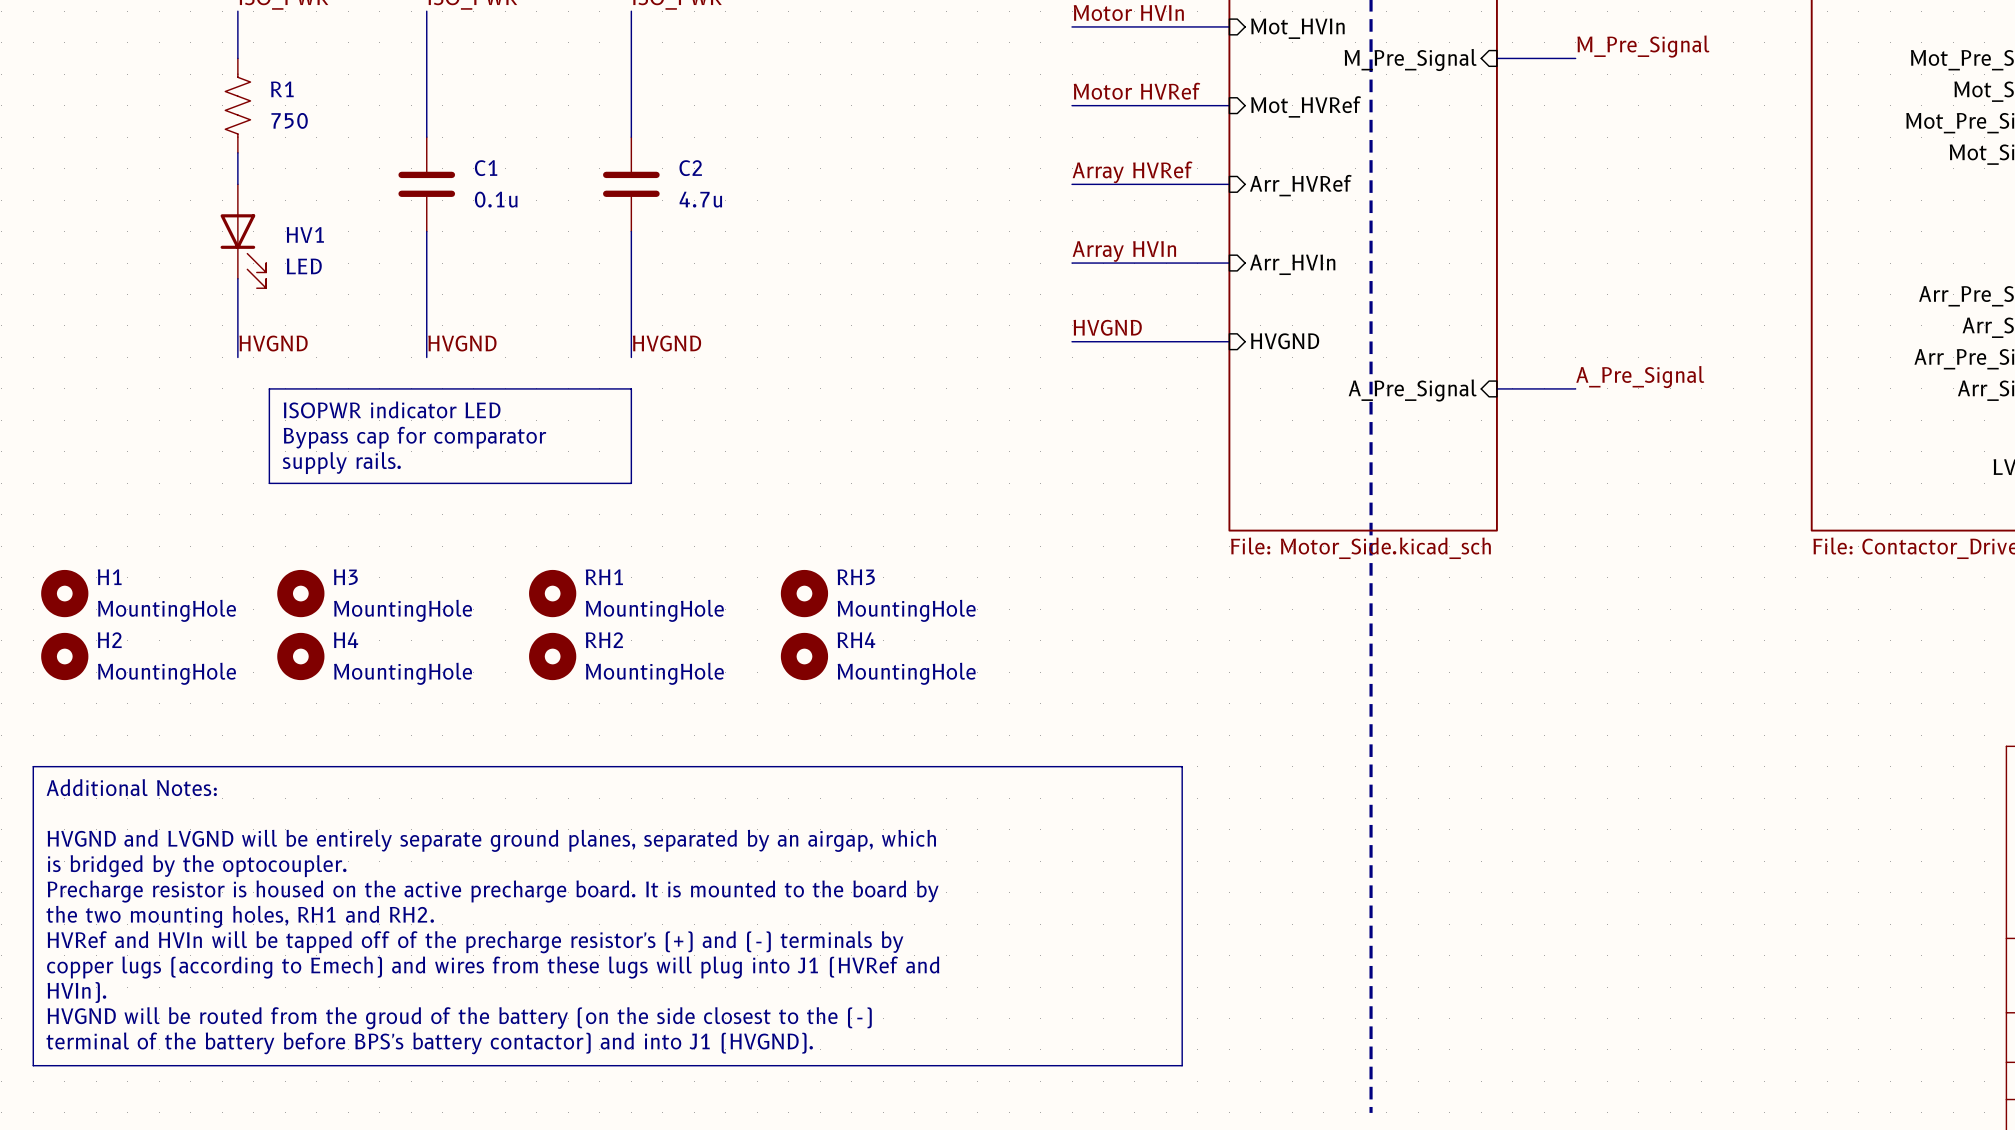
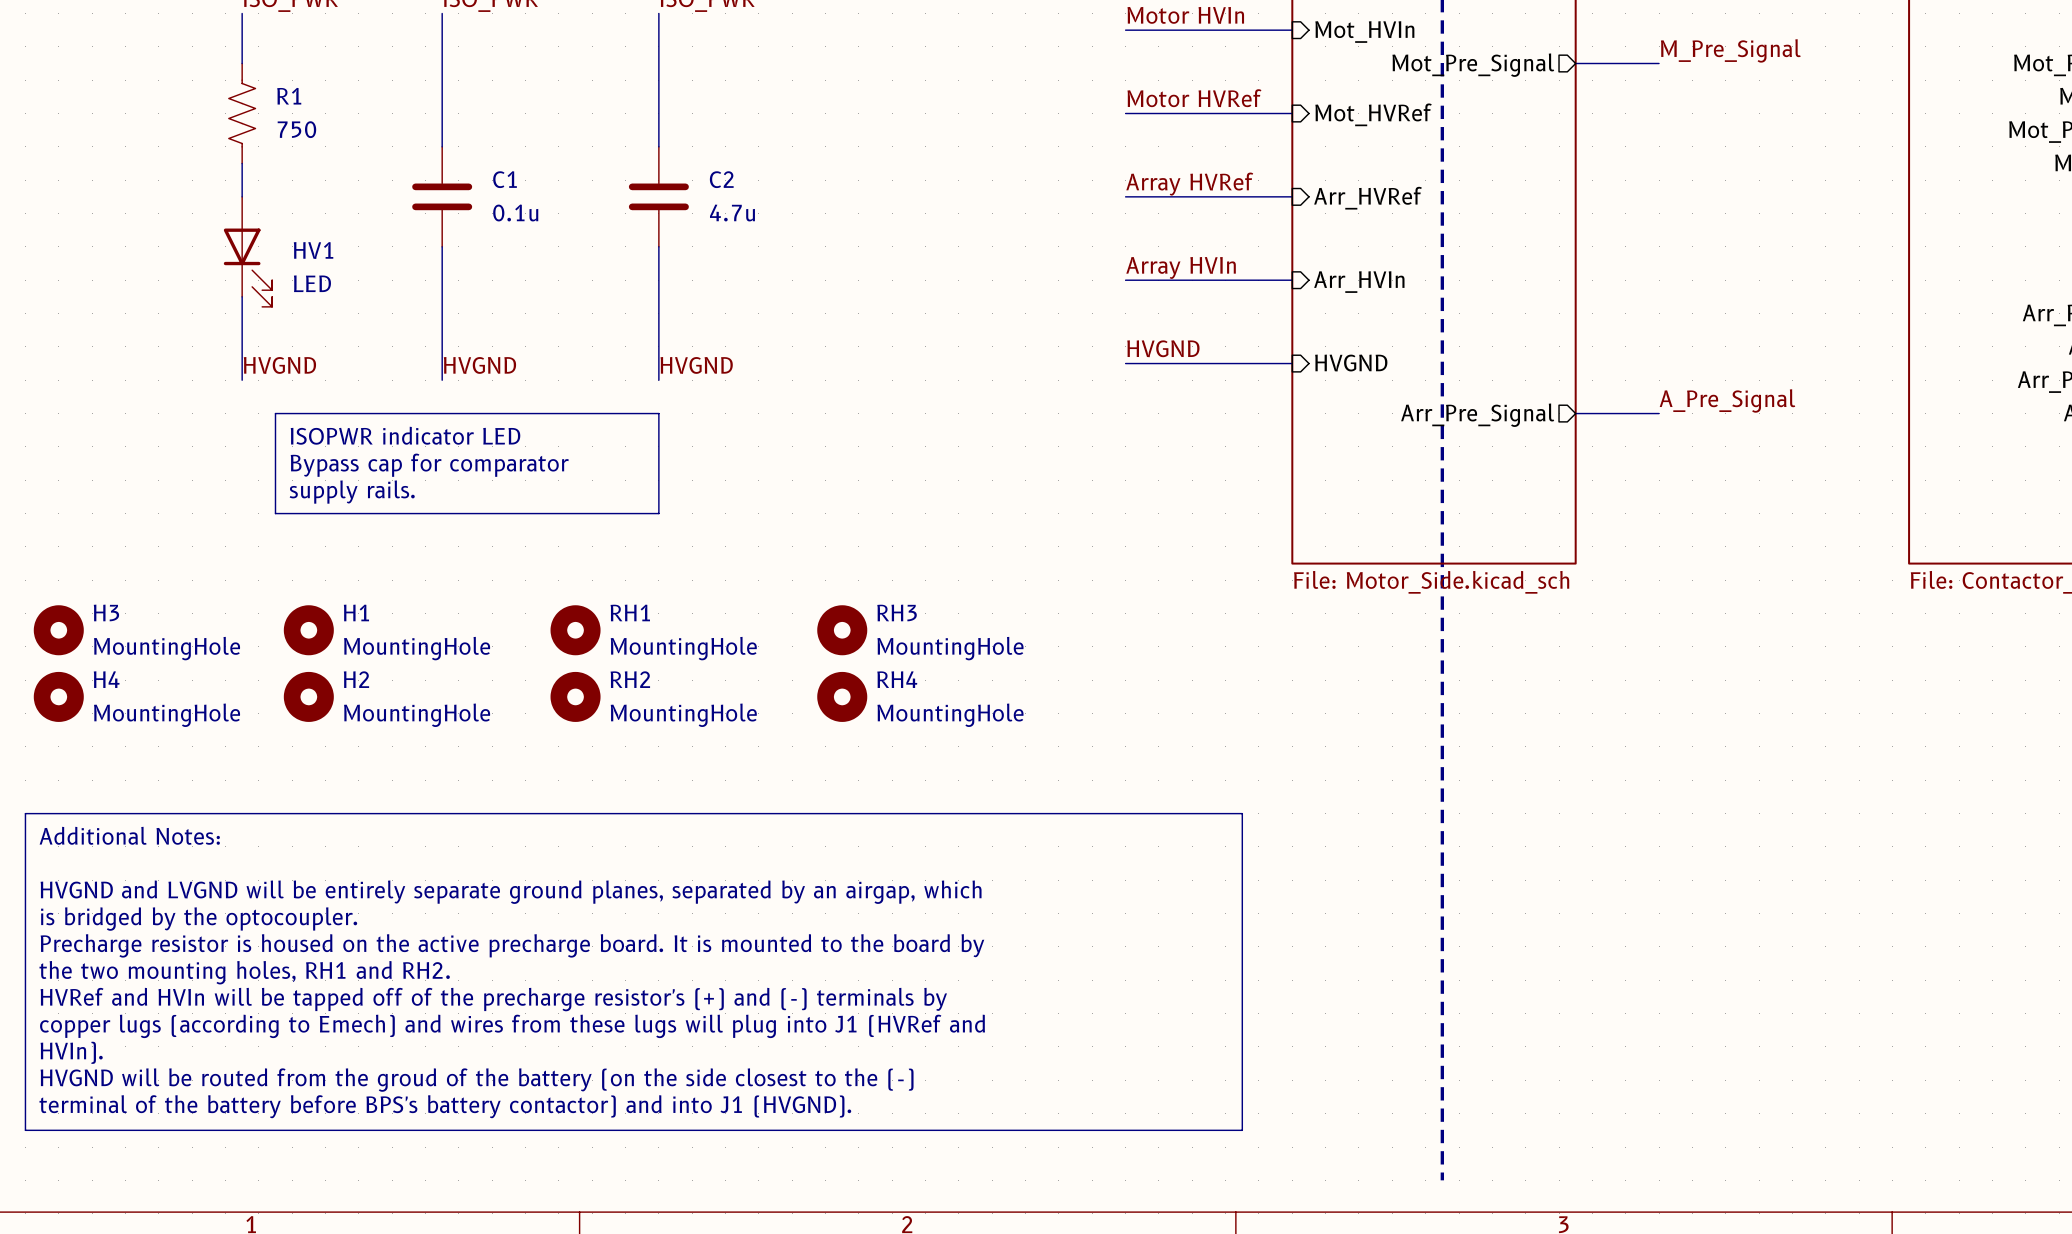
sheet pin shape: input (1410, 60) -> output (1473, 65)
sheet pin: M_Pre_Signal (1410, 60) -> Mot_Pre_Signal (1473, 65)
sheet pin shape: input (1412, 390) -> output (1477, 415)
sheet pin: A_Pre_Signal (1412, 390) -> Arr_Pre_Signal (1477, 415)
H1 name: H1 (109, 577) -> H3 (106, 612)
H3 name: H3 (345, 577) -> H1 (356, 612)
H2 name: H2 (109, 640) -> H4 (106, 679)
H4 name: H4 (346, 640) -> H2 (356, 679)

